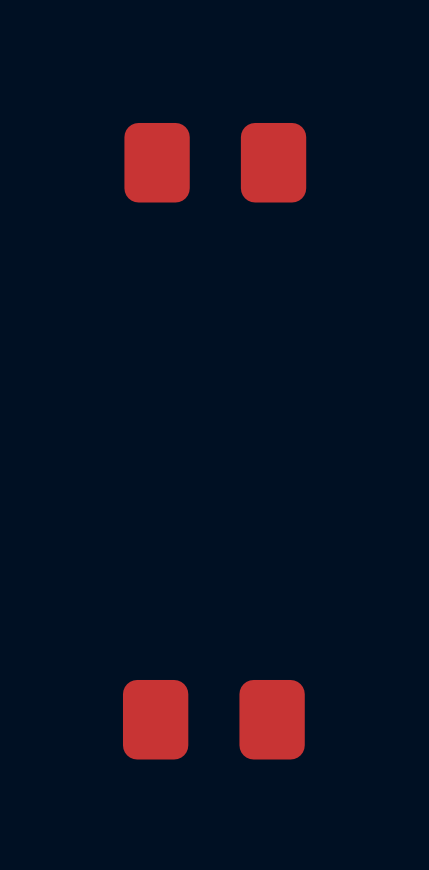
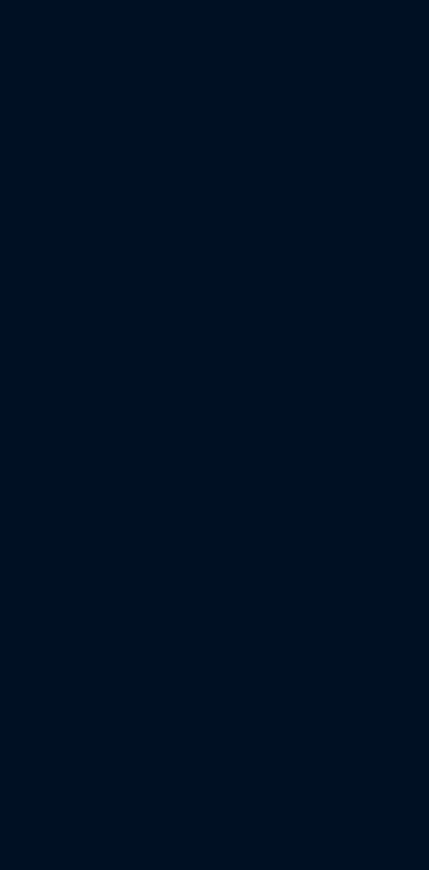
part: (215, 162) -> none
part: (213, 719) -> none

